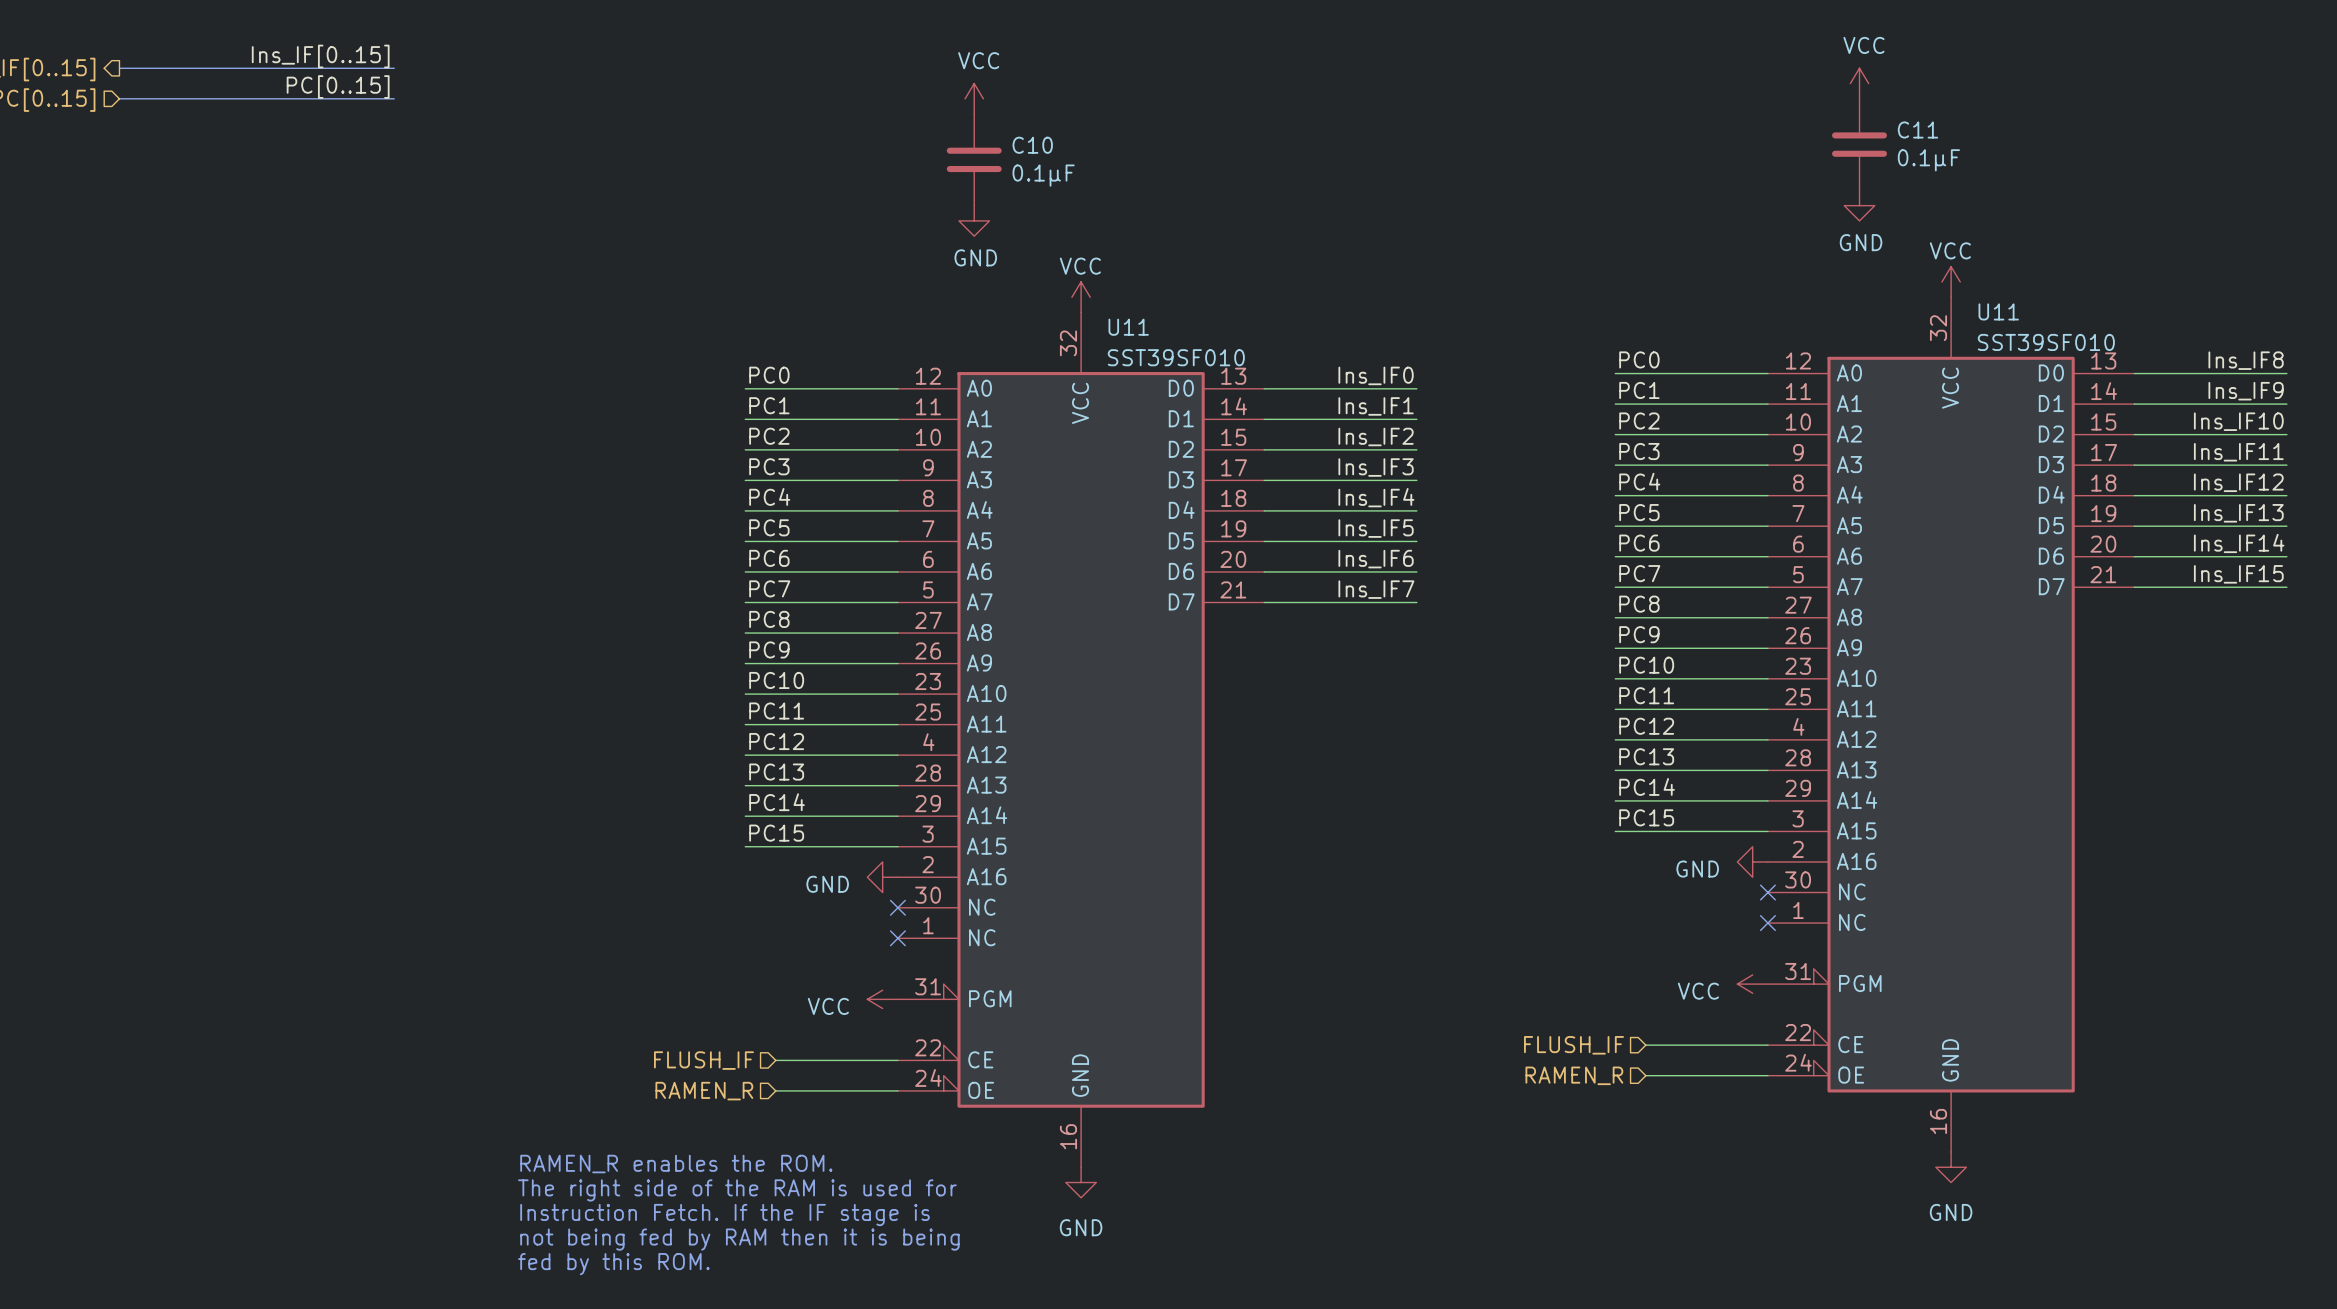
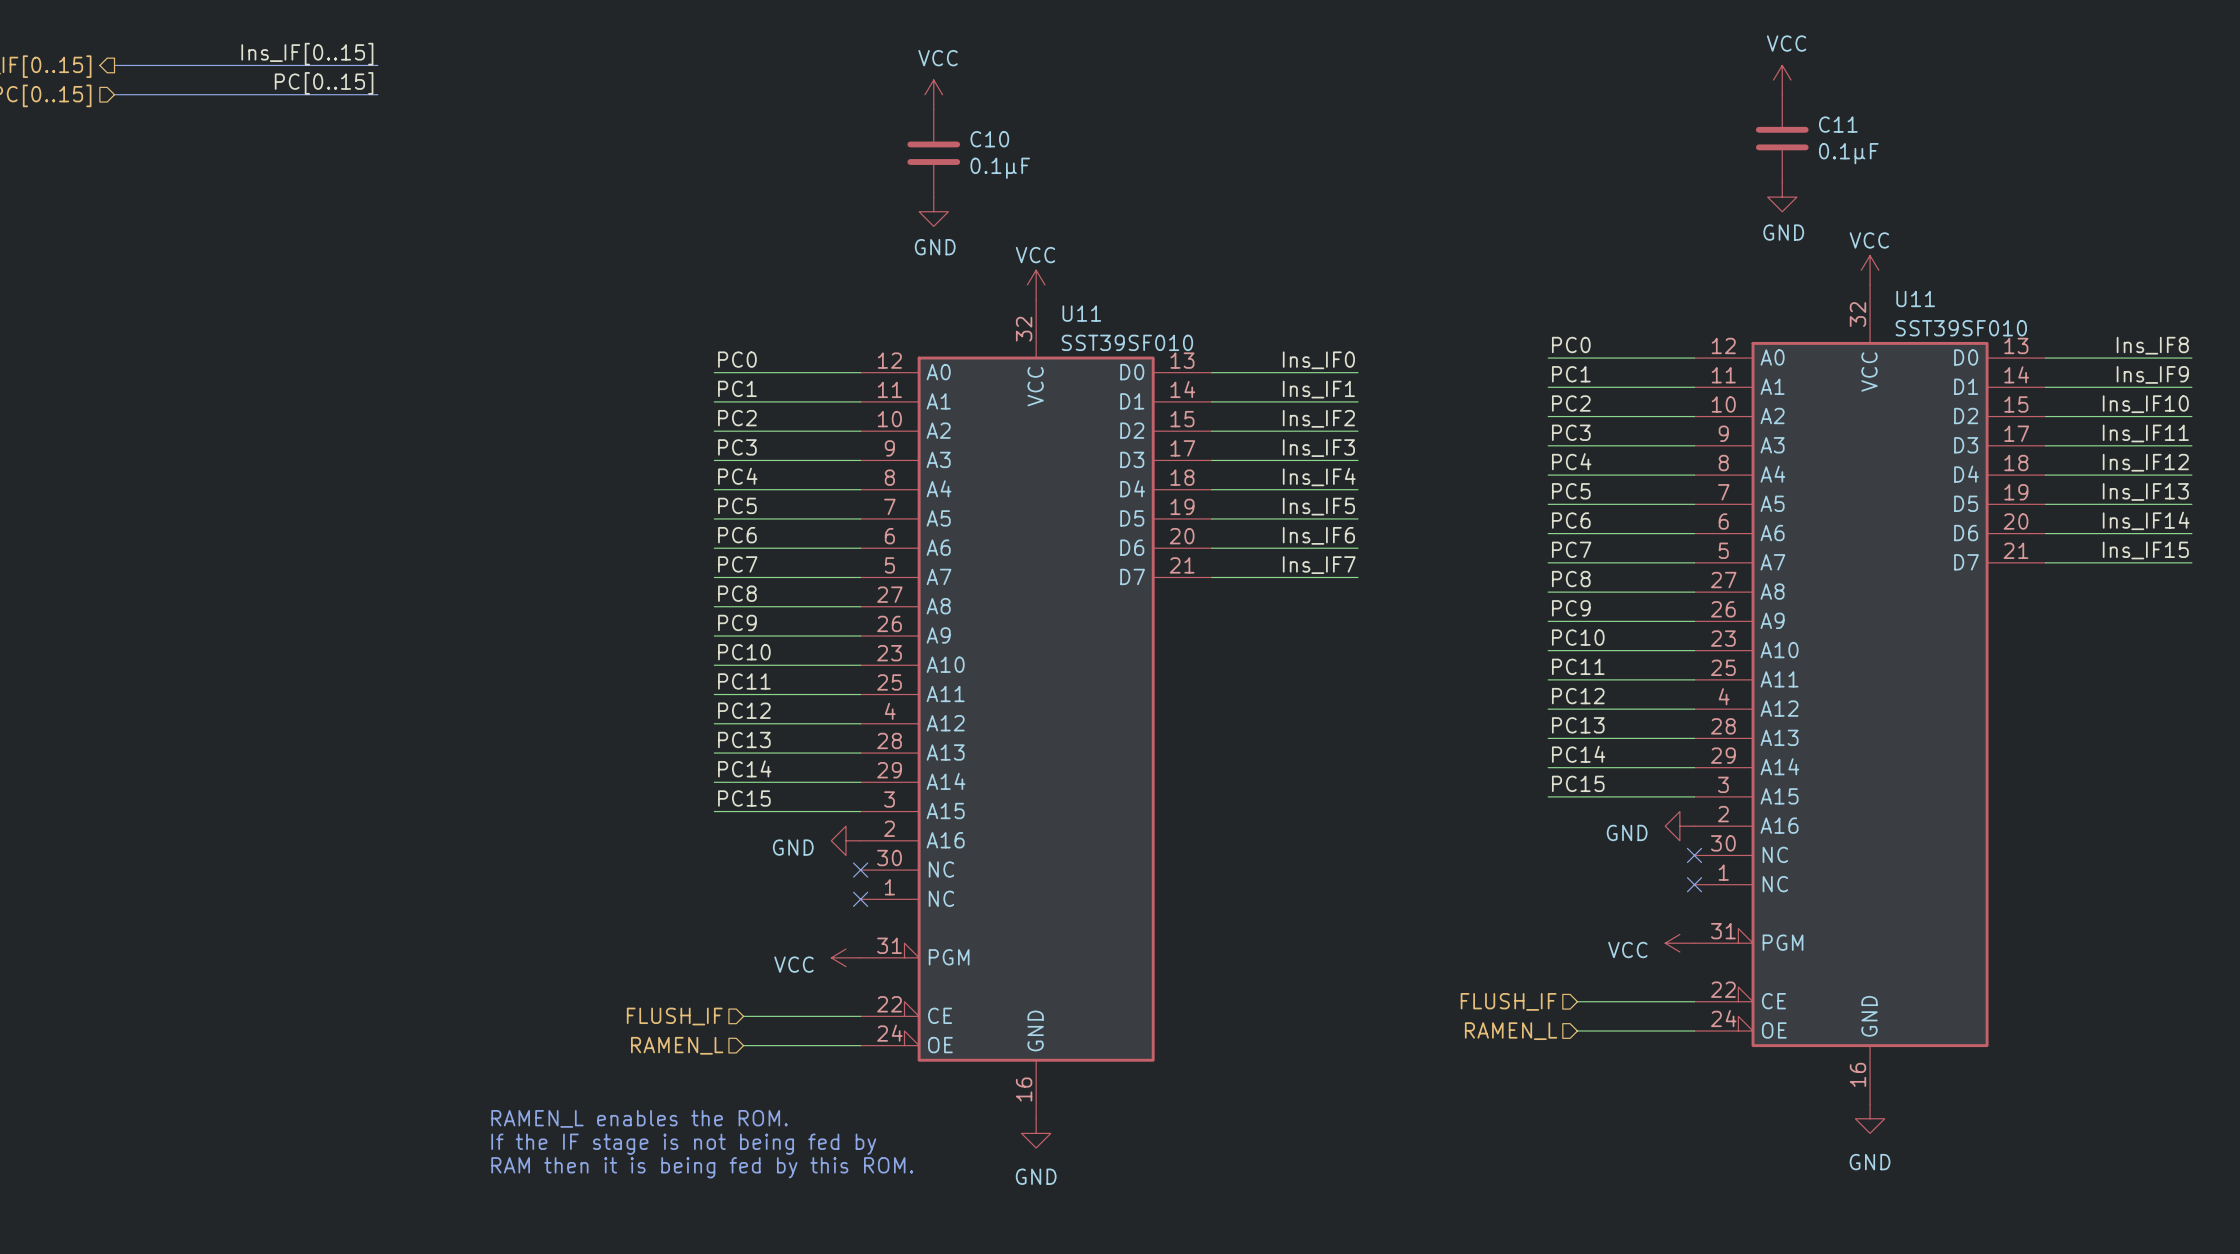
hierarchical label: RAMEN_R (1574, 1075) -> RAMEN_L (1511, 1031)
hierarchical label: RAMEN_R (704, 1091) -> RAMEN_L (677, 1045)
text: RAMEN_R enables the ROM. (676, 1164) -> RAMEN_L enables the ROM. (639, 1118)
text: The right side of the RAM is used for (737, 1190) -> If the IF stage is not being fed by (683, 1144)
text: Instruction Fetch. If the IF stage is (725, 1214) -> RAM then it is being fed by this ROM. (702, 1167)
text: not being fed by RAM then it is being (739, 1239) -> none
text: fed by this ROM. (613, 1264) -> none

